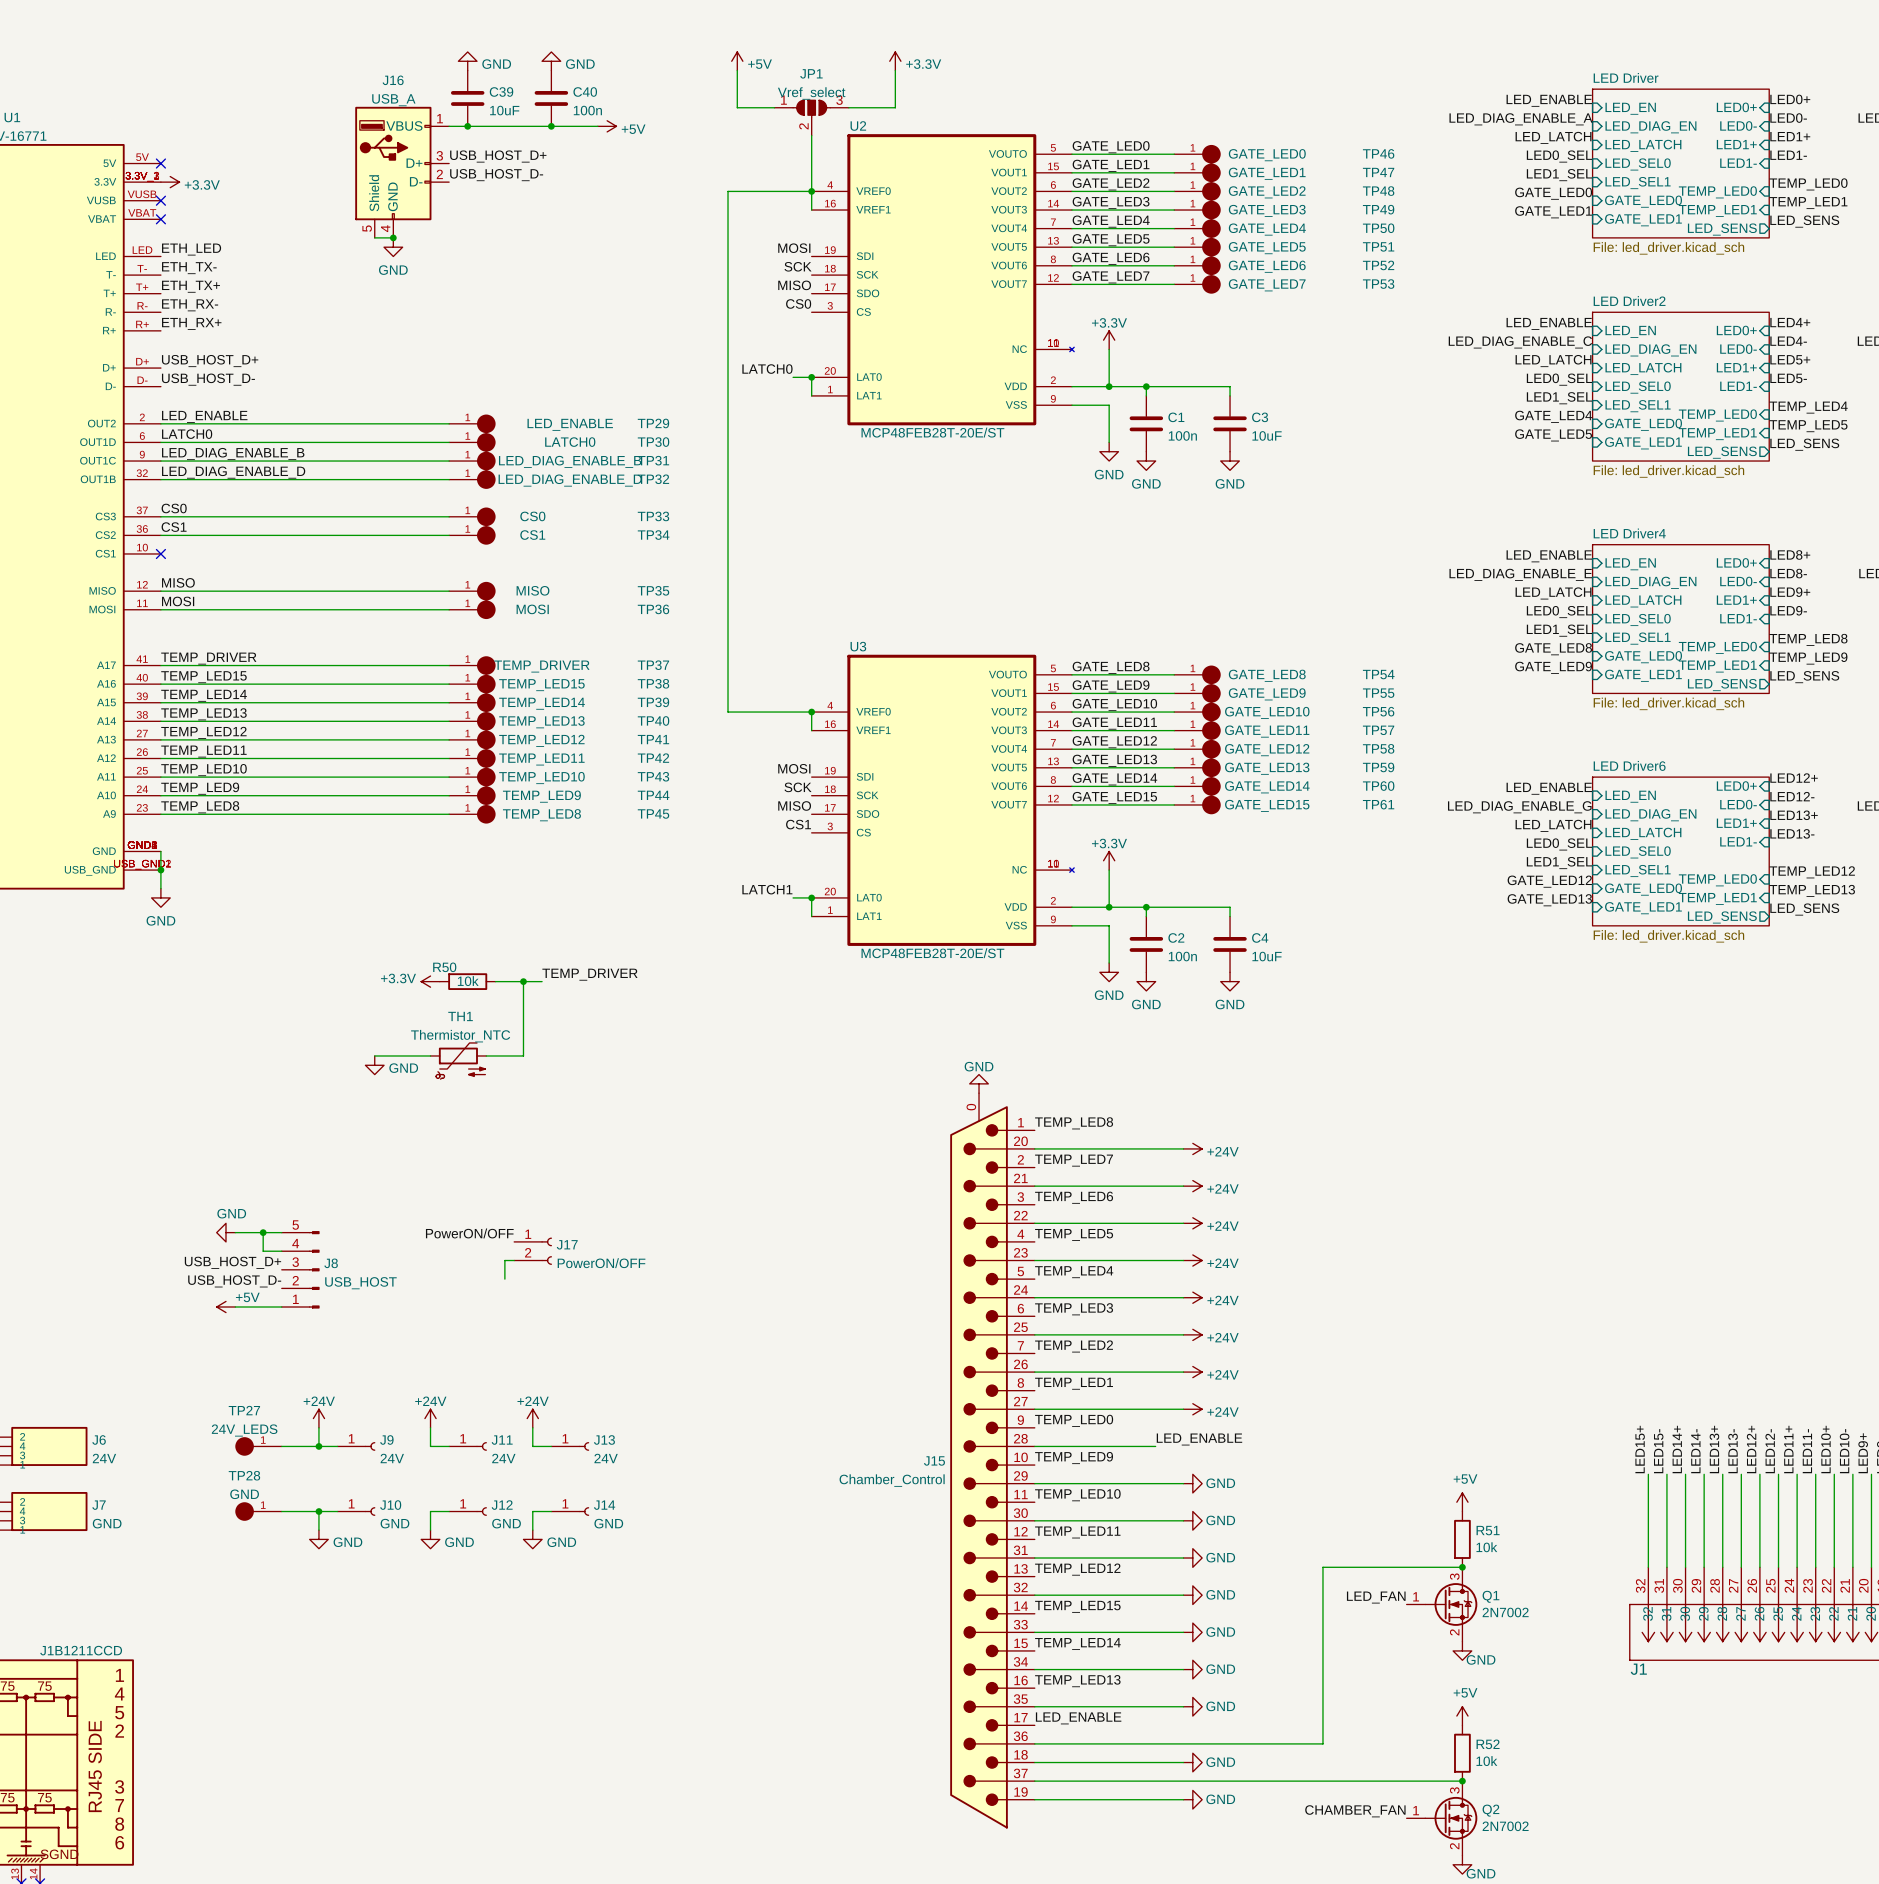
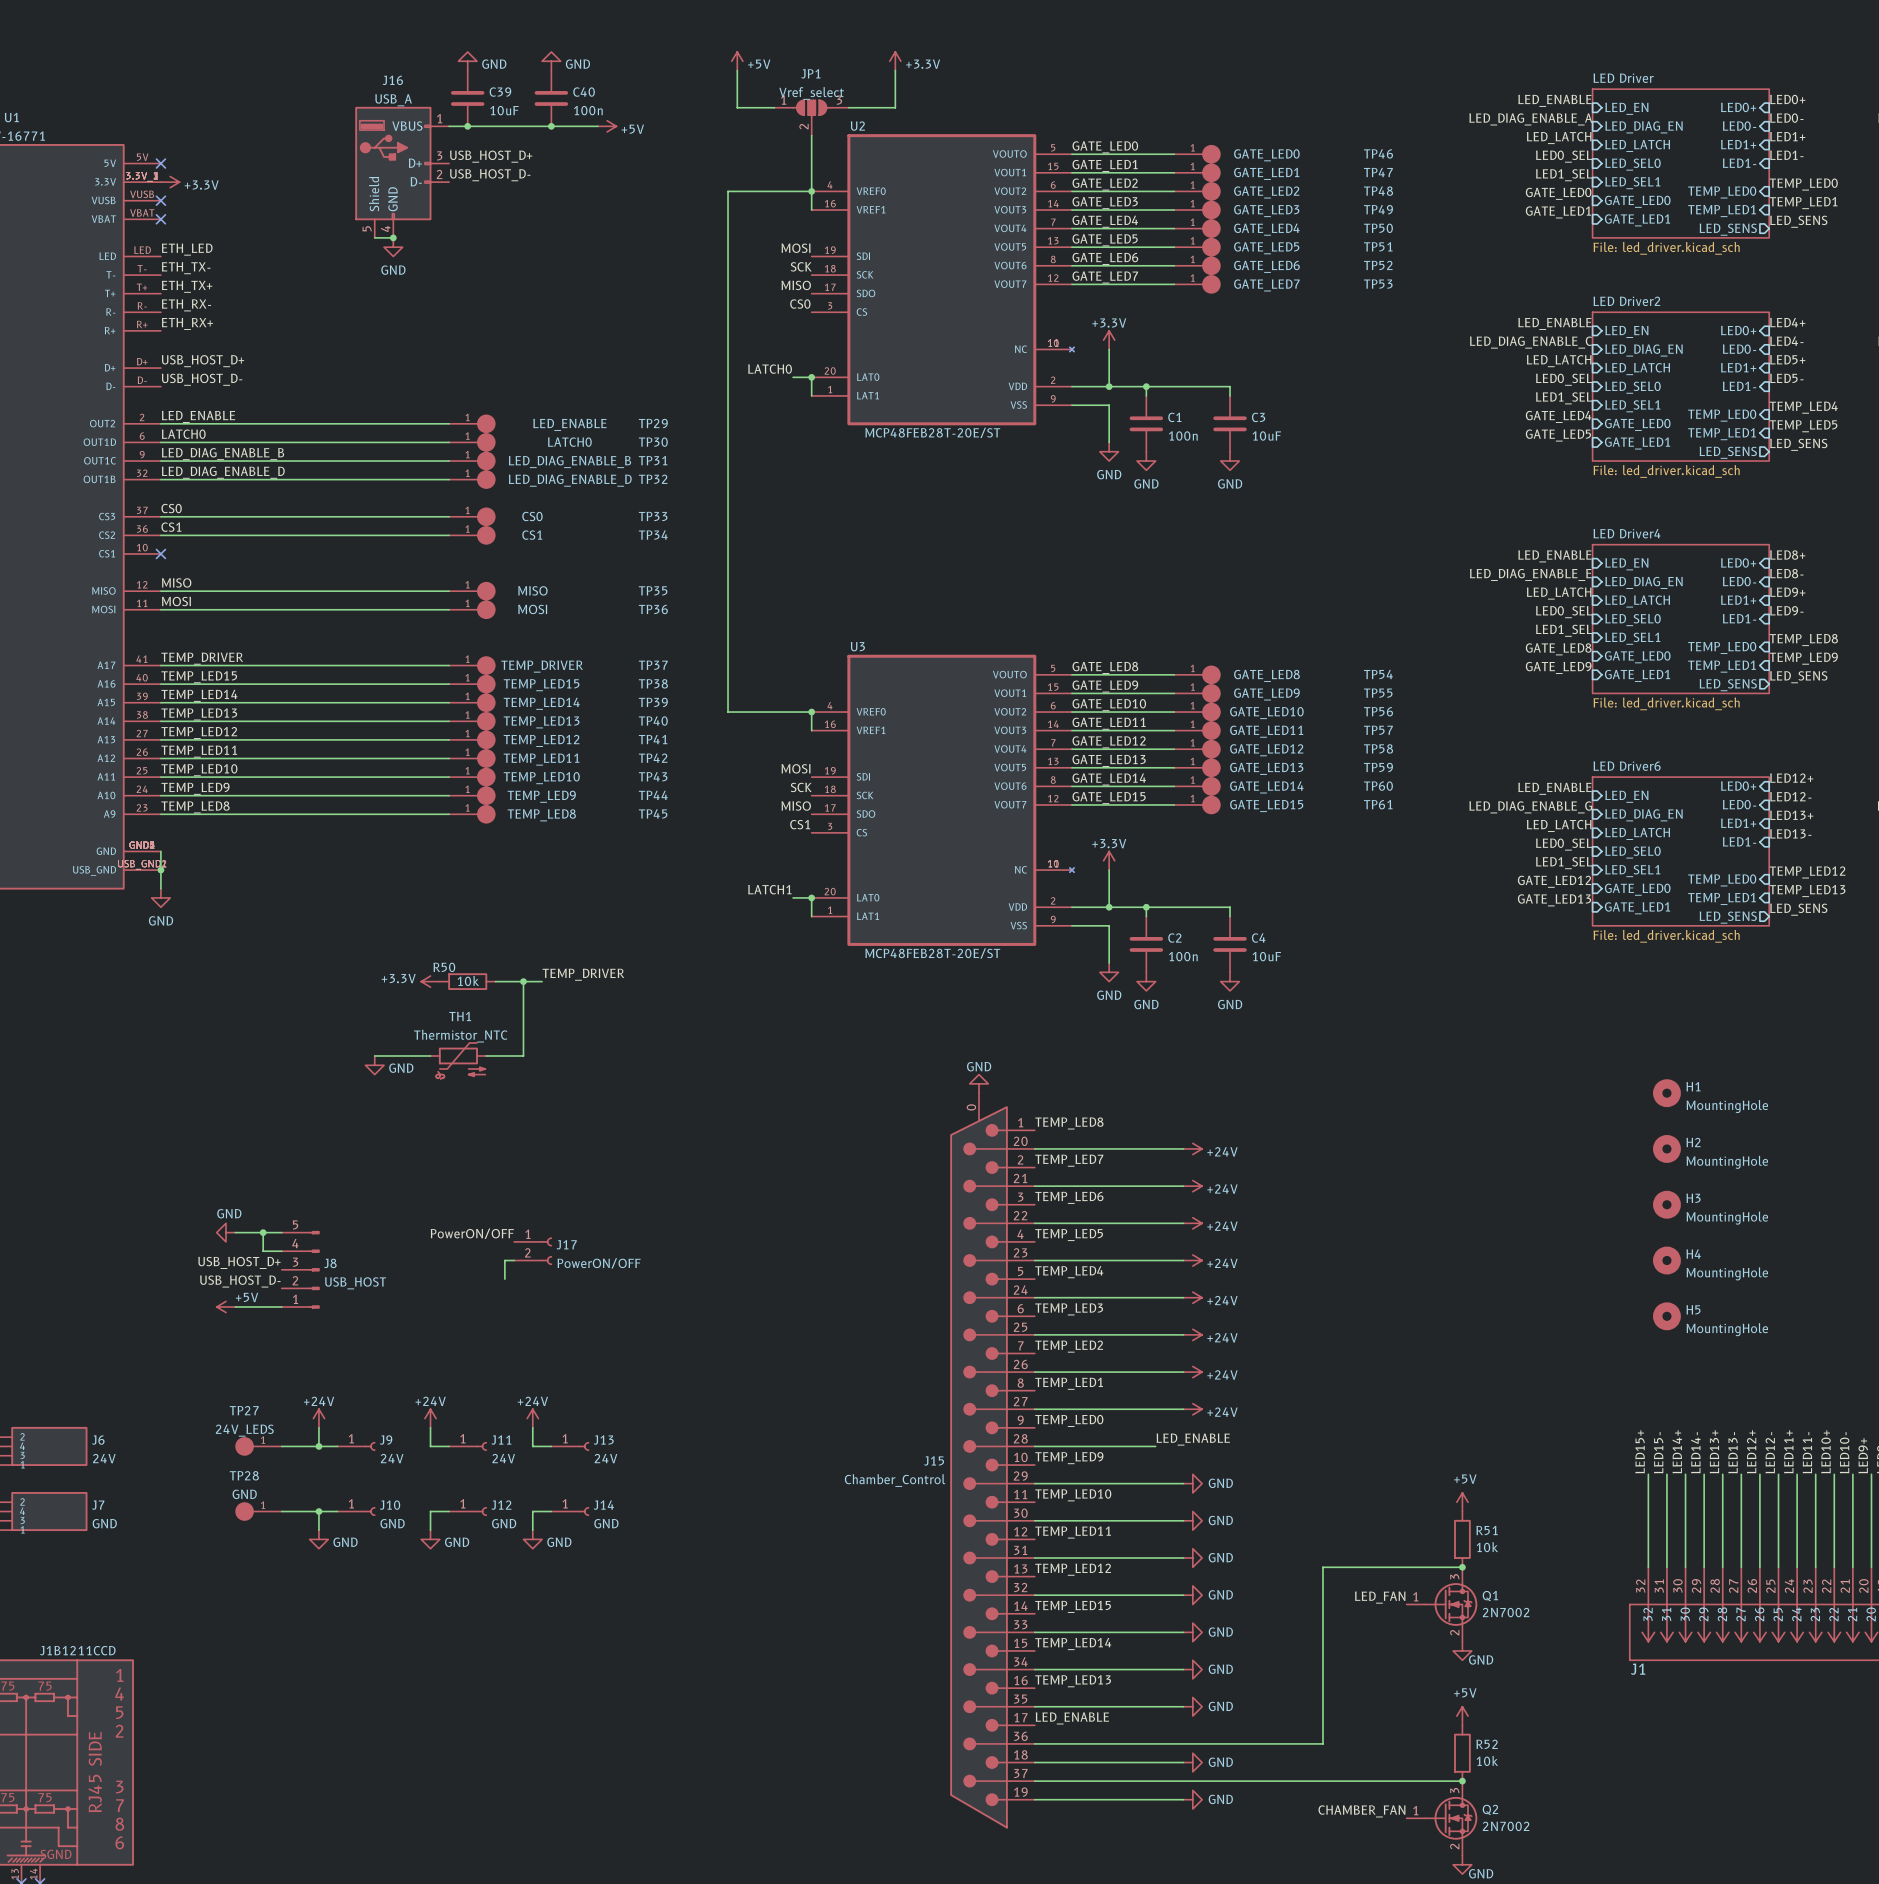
H1: none -> MountingHole (1666, 1093)
H2: none -> MountingHole (1666, 1148)
H3: none -> MountingHole (1666, 1204)
H4: none -> MountingHole (1666, 1260)
H5: none -> MountingHole (1666, 1316)

